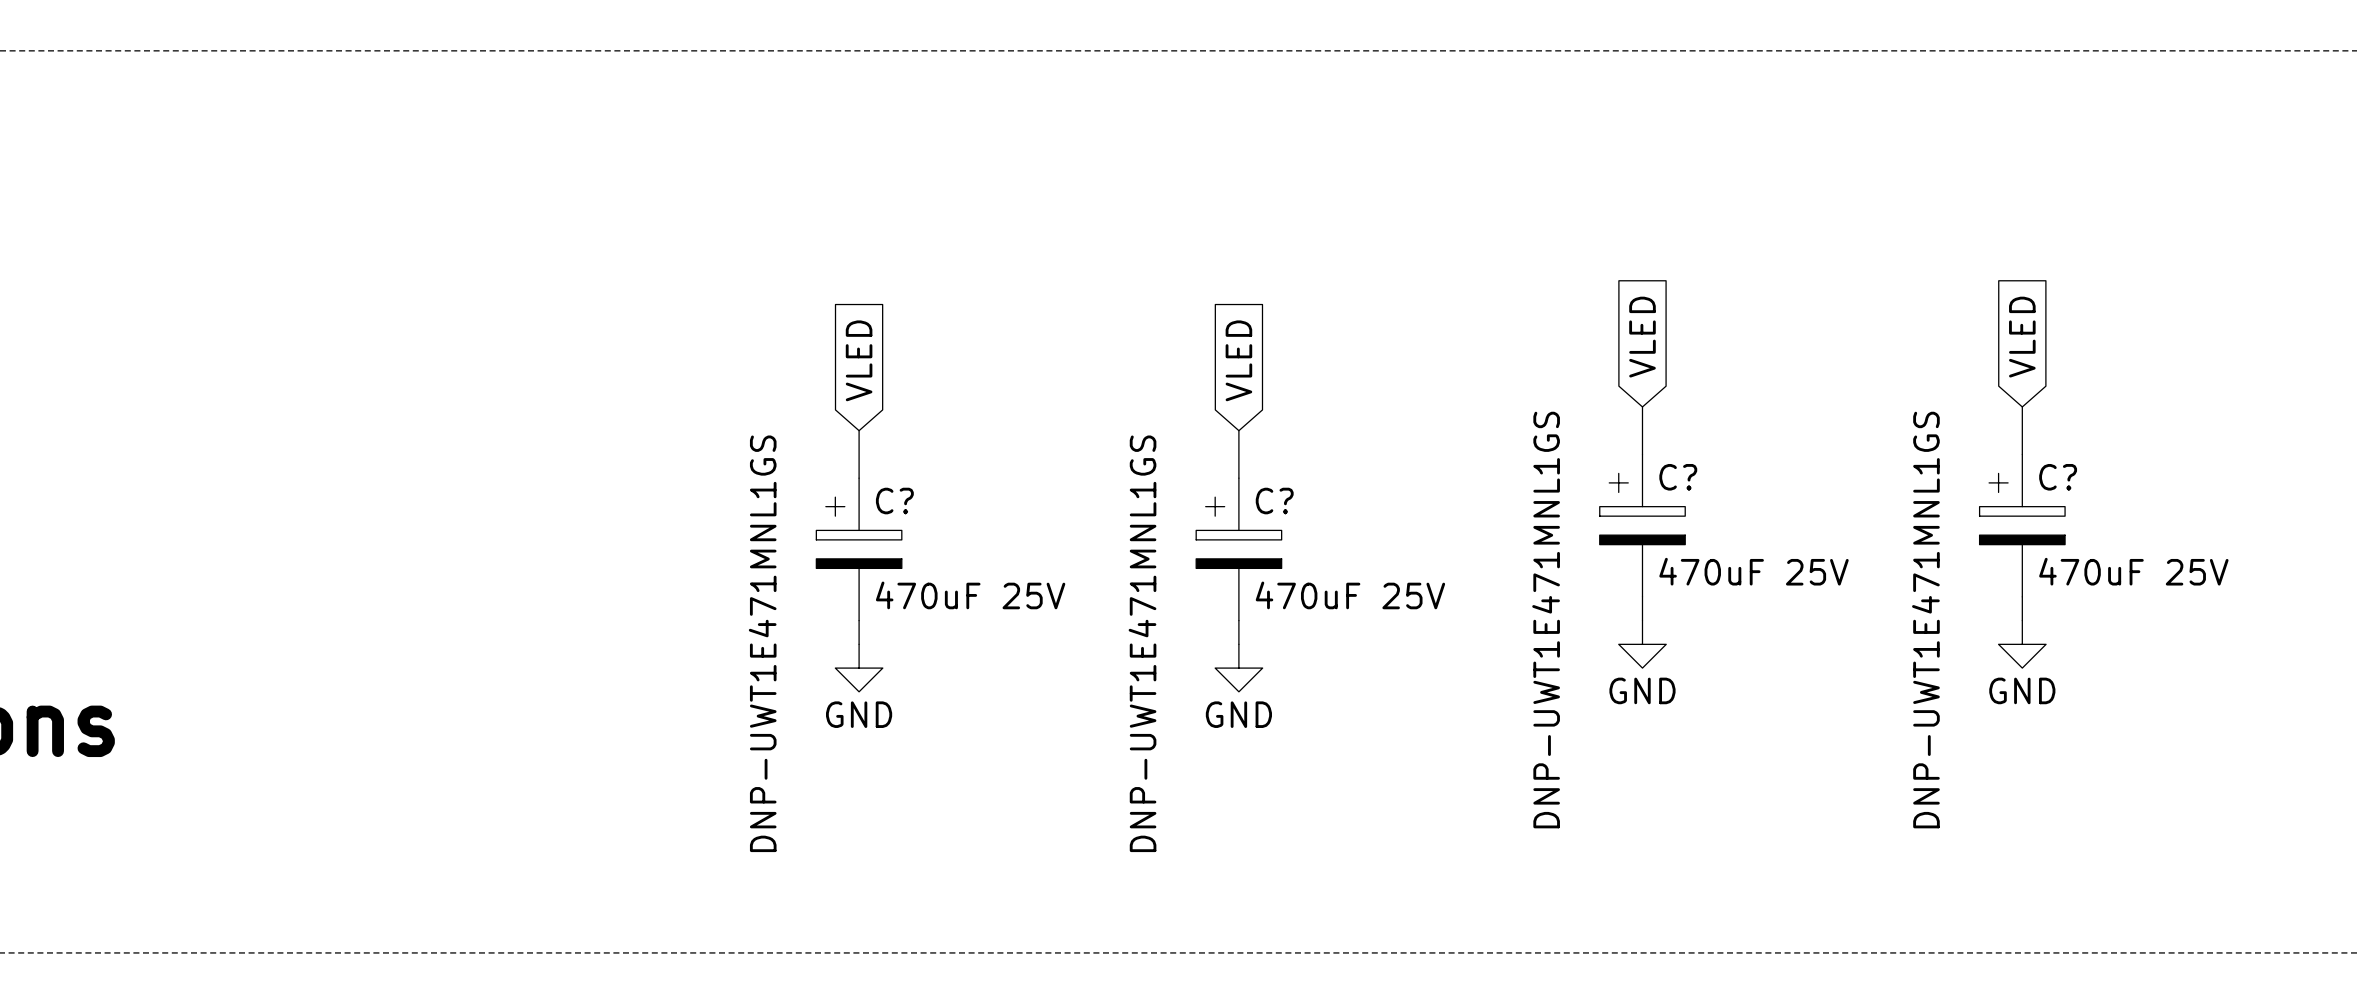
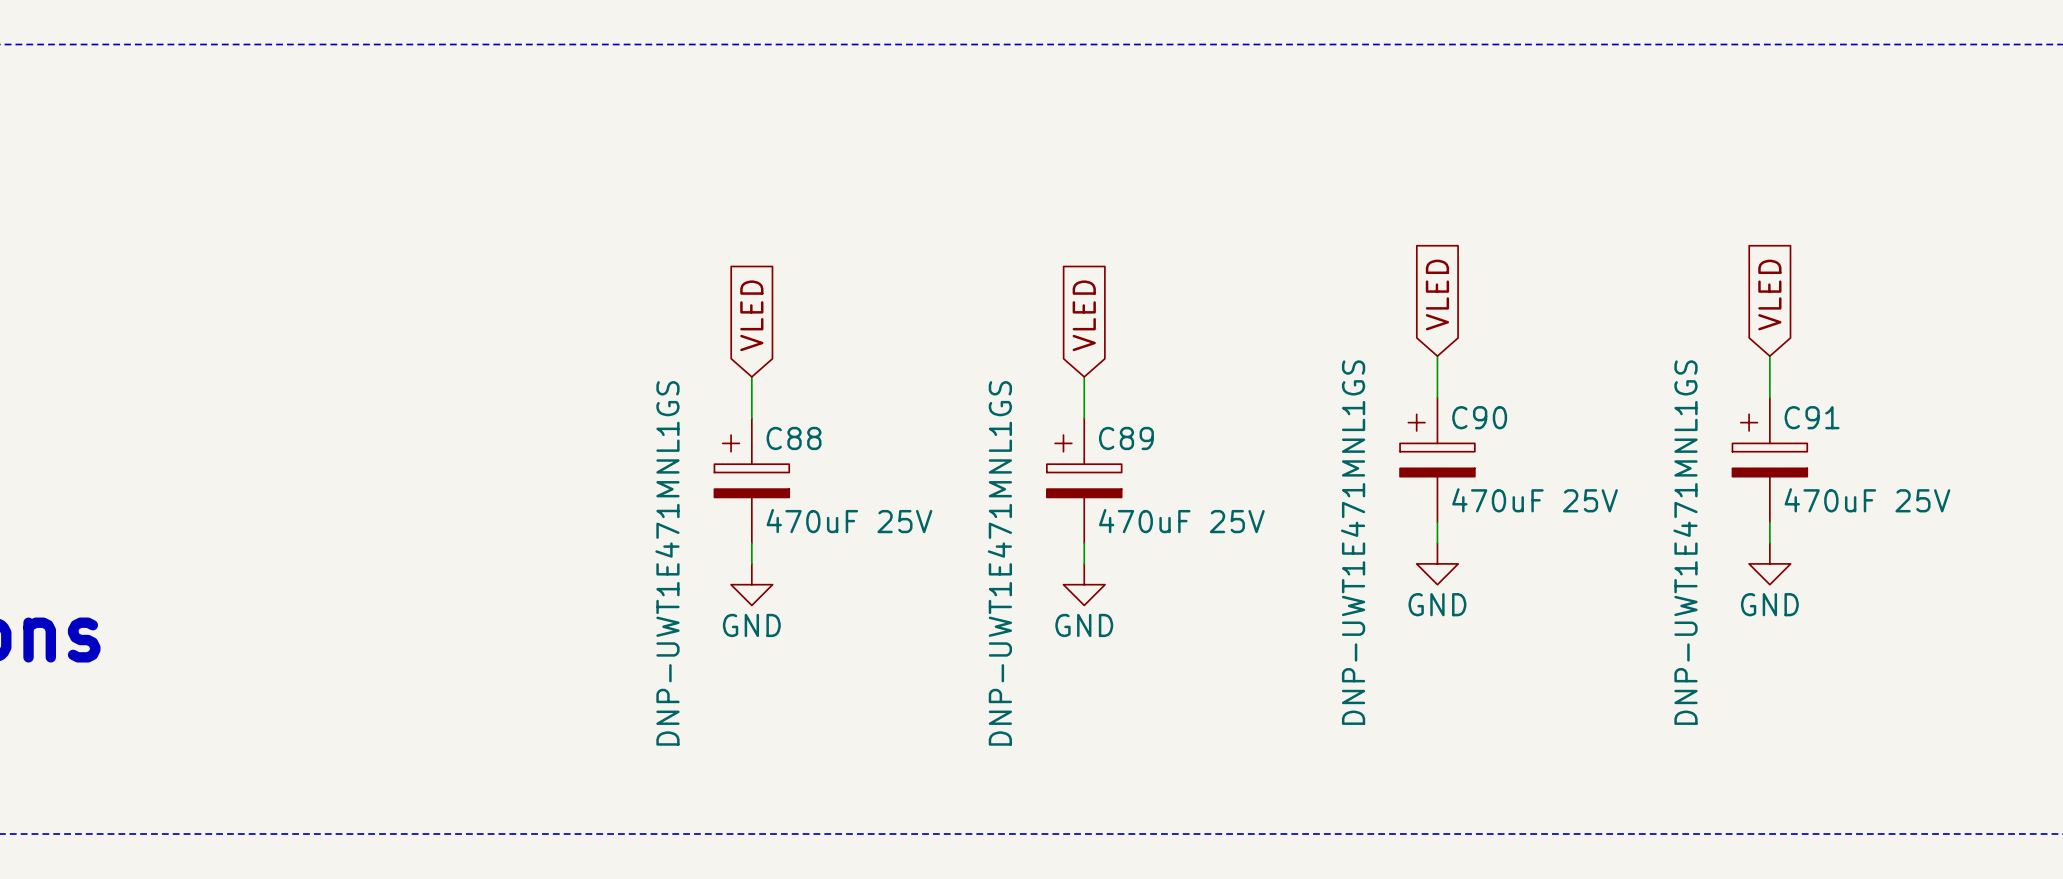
C? name: C? (1678, 477) -> C90 (1479, 417)
C? name: C? (2058, 477) -> C91 (1812, 417)
C? name: C? (894, 501) -> C88 (794, 438)
C? name: C? (1274, 501) -> C89 (1126, 438)

